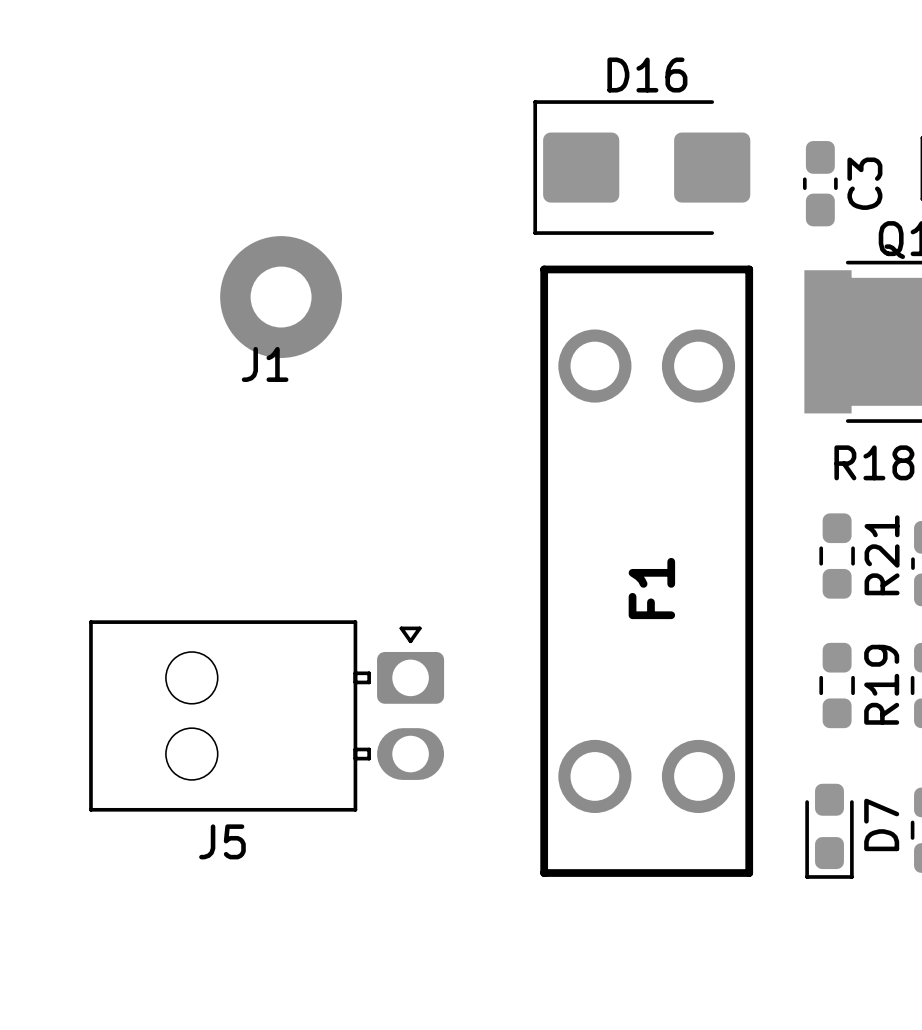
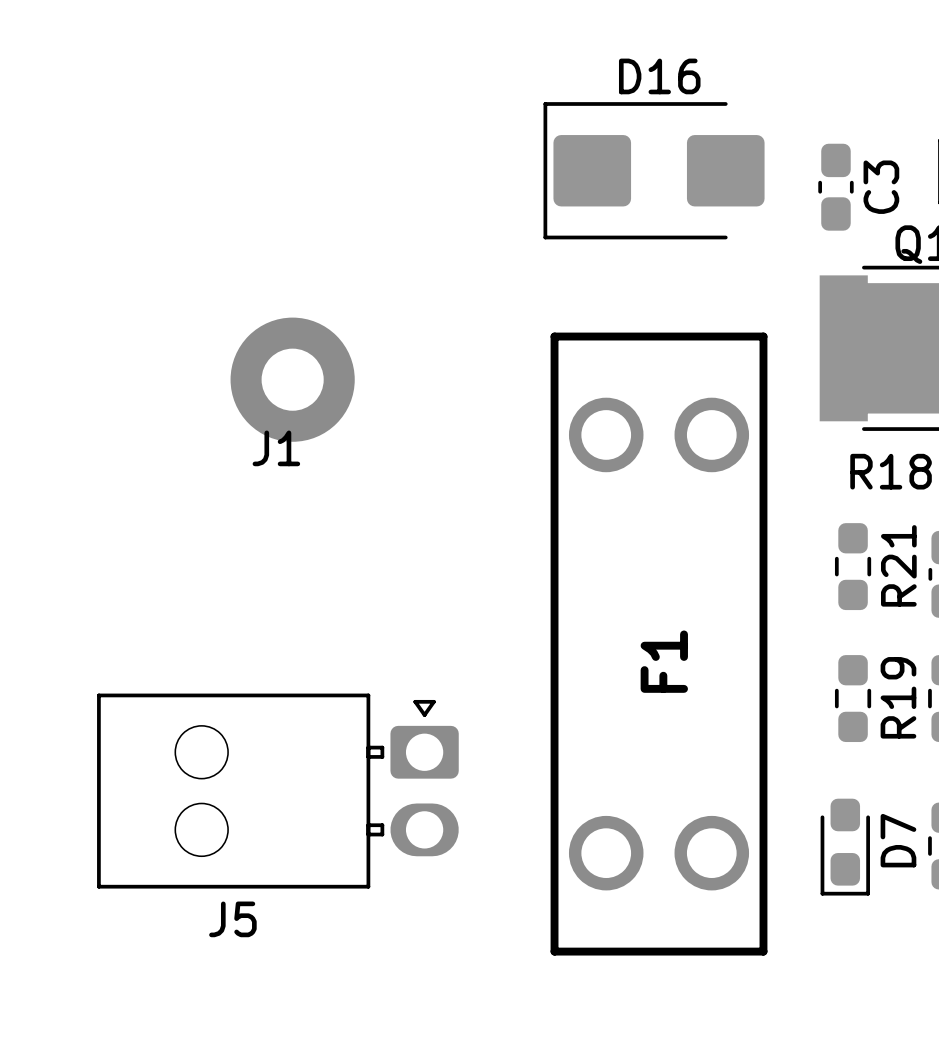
J1 position: (281, 297) -> (292, 379)
F1 position: (646, 571) -> (659, 644)
J5 position: (266, 715) -> (277, 791)

